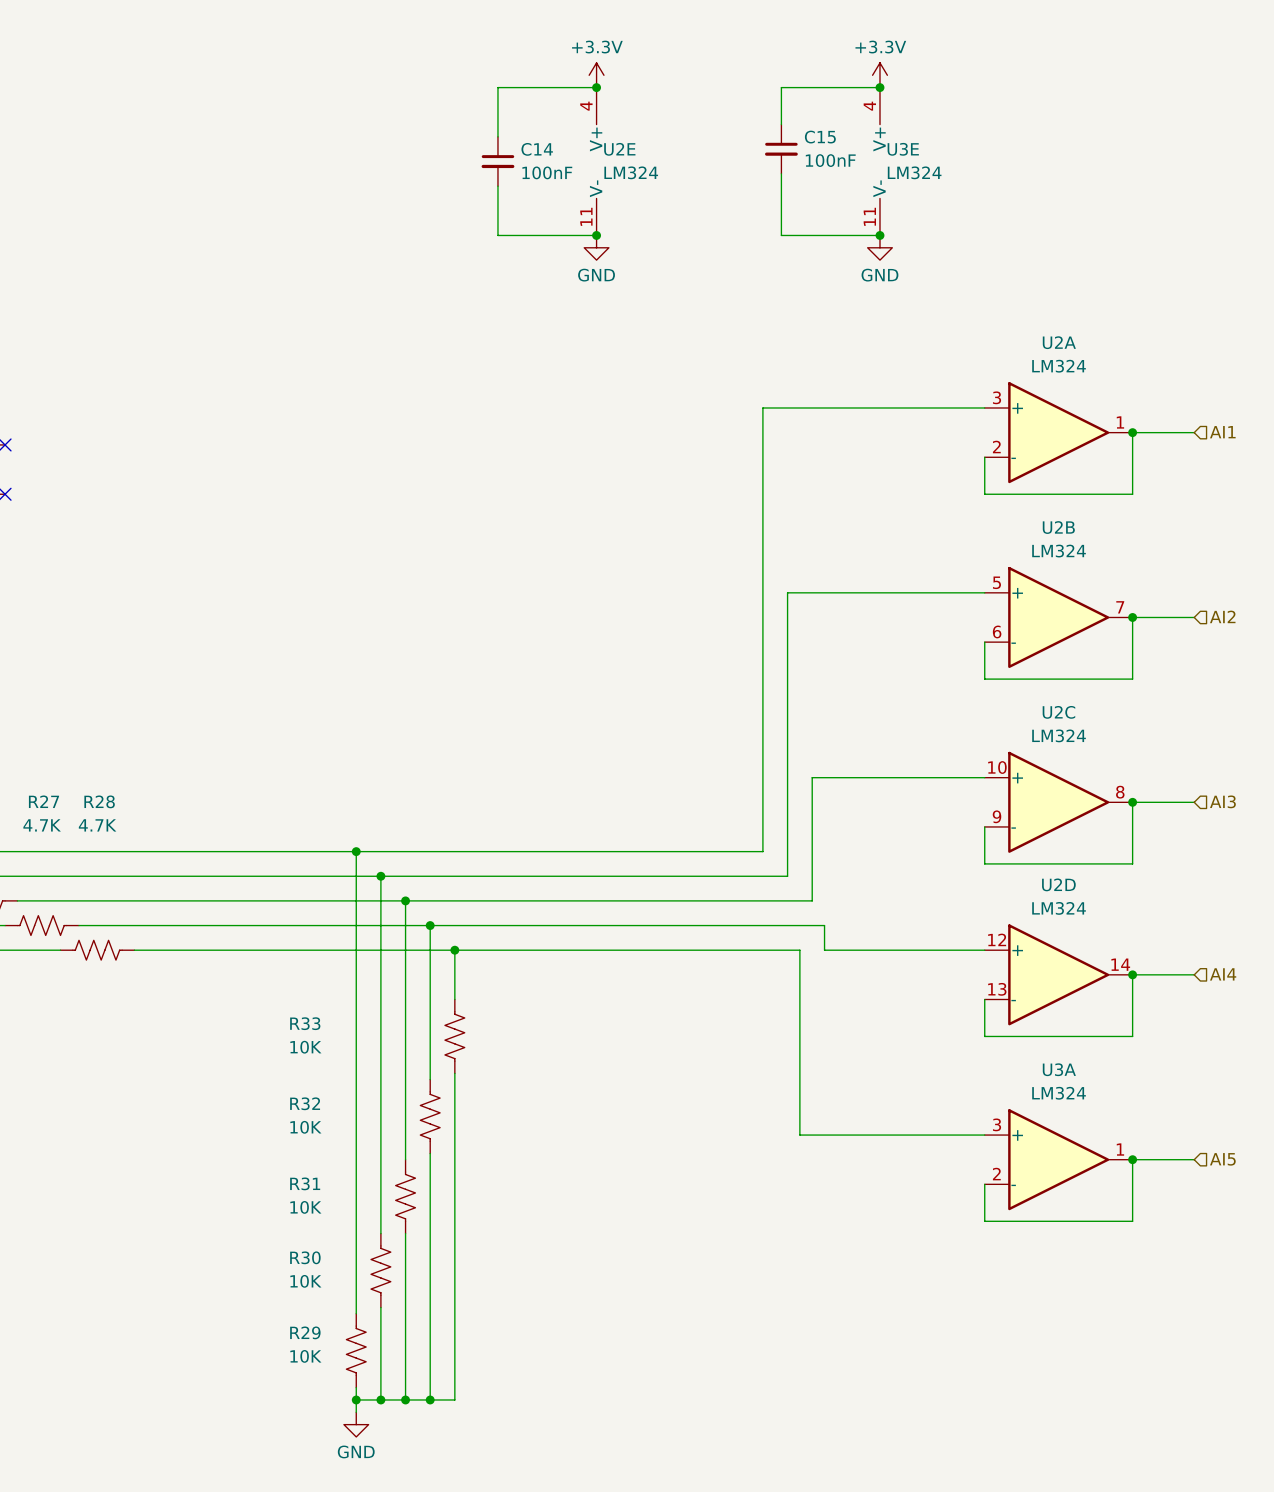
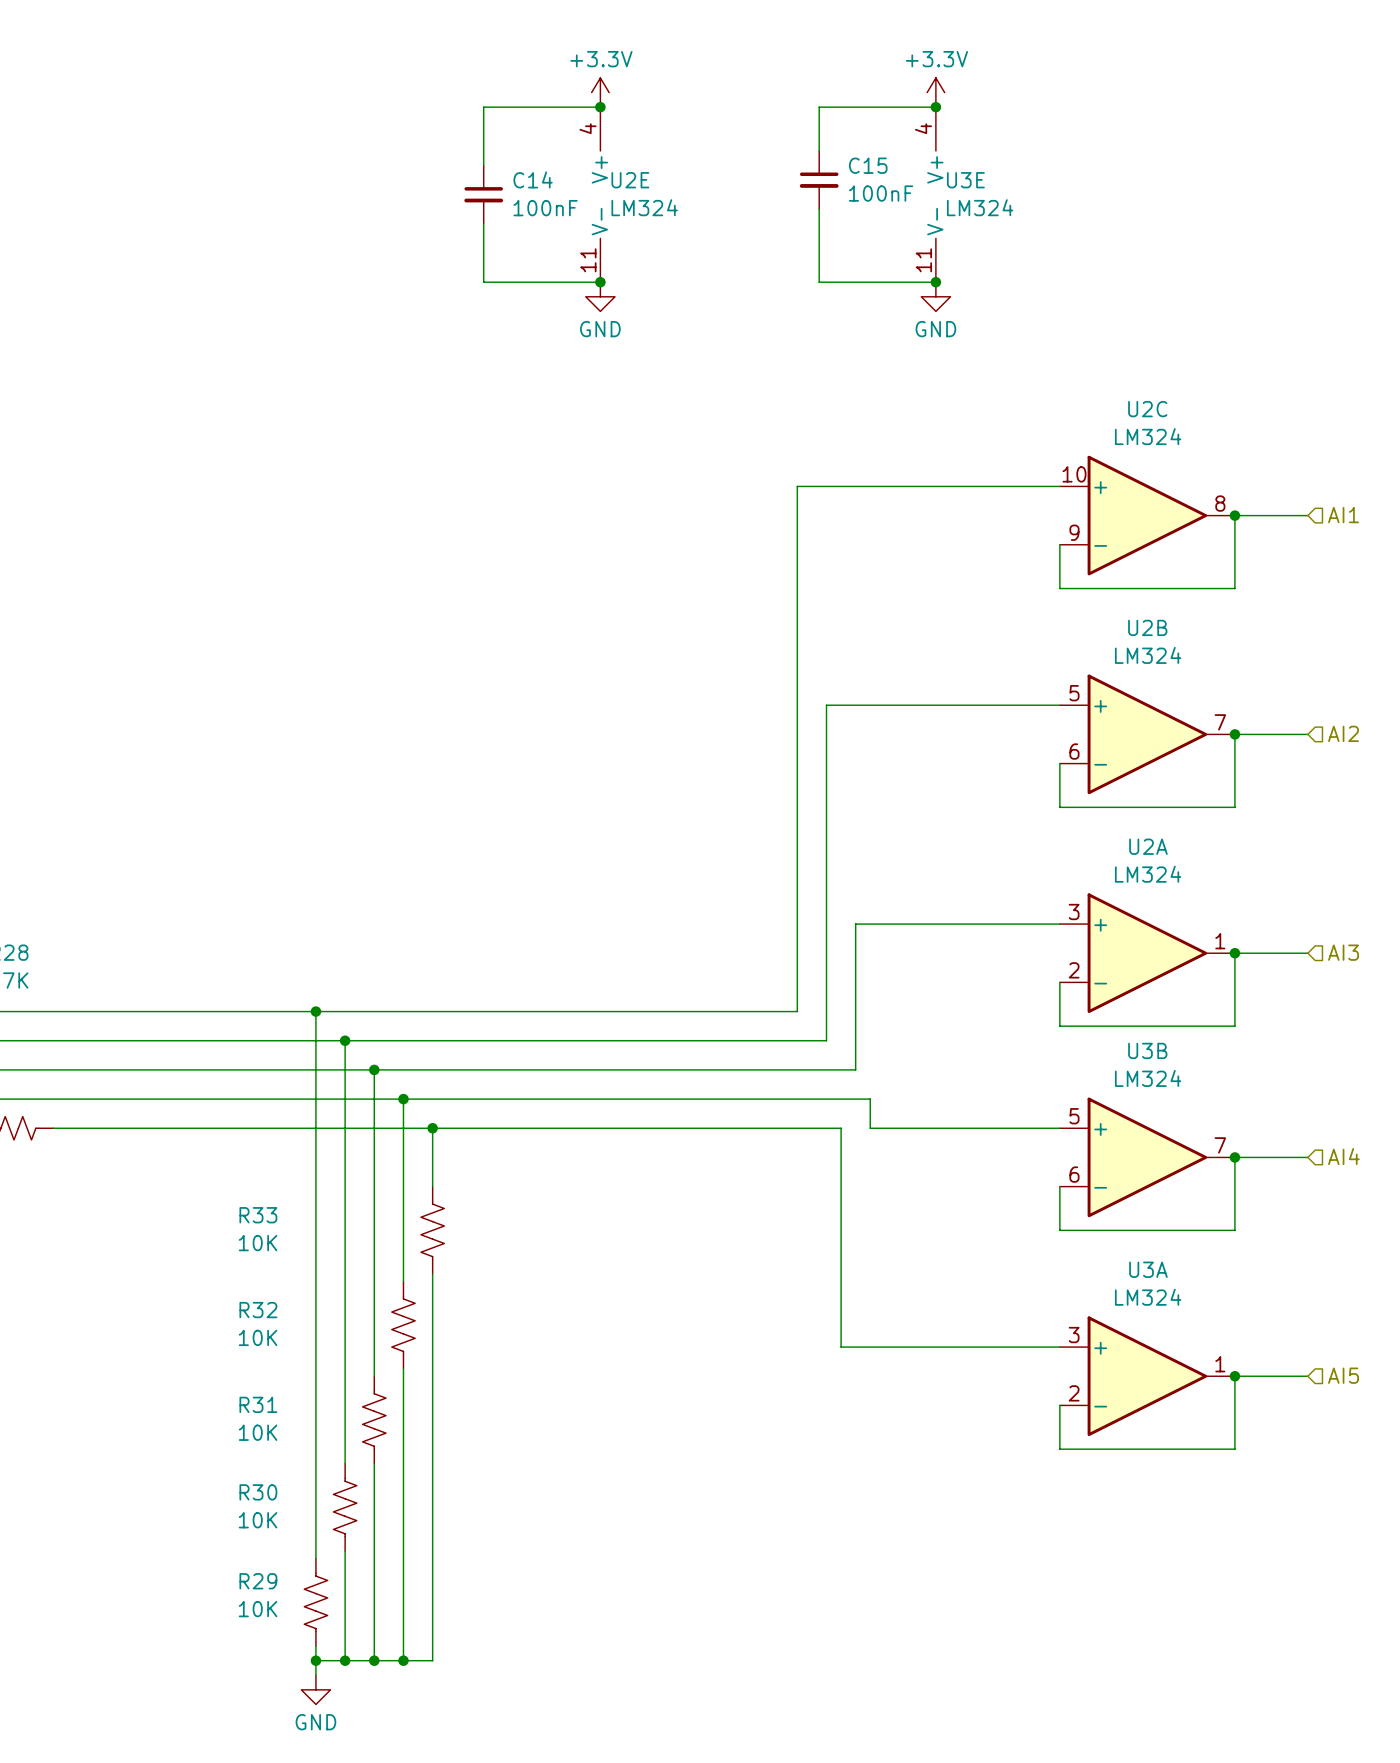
U2A position: (1058, 432) -> (1147, 953)
U2C position: (1058, 802) -> (1147, 515)
U2D name: U2D (1058, 884) -> U3B (1147, 1050)
U2D pin number: 12 (997, 939) -> 5 (1074, 1116)
U2D pin number: 14 (1120, 964) -> 7 (1220, 1145)
U2D pin number: 13 (997, 989) -> 6 (1074, 1174)

